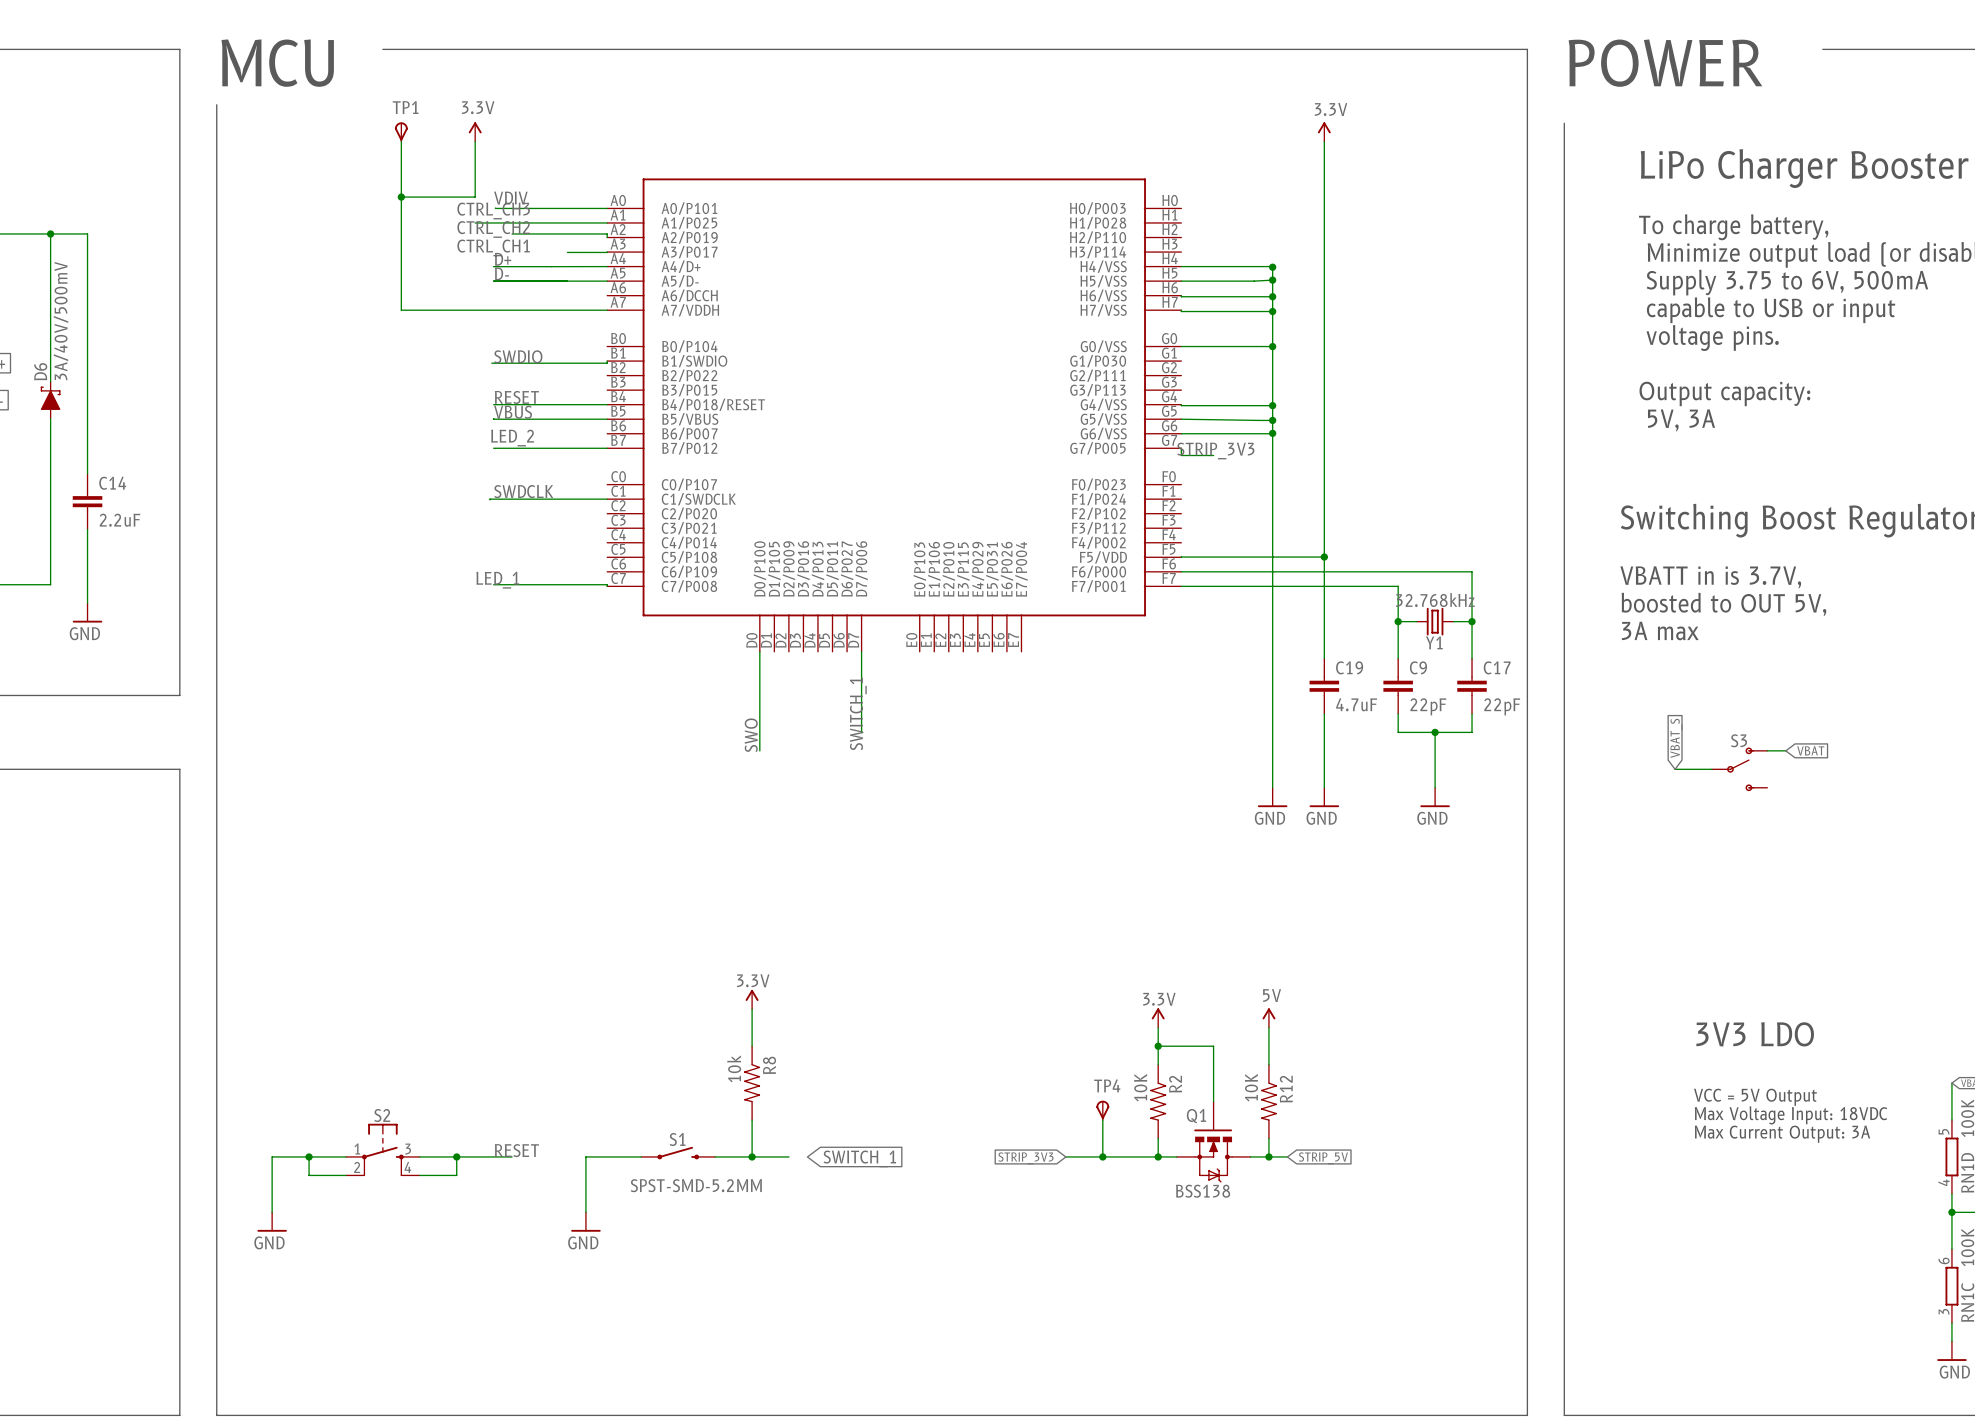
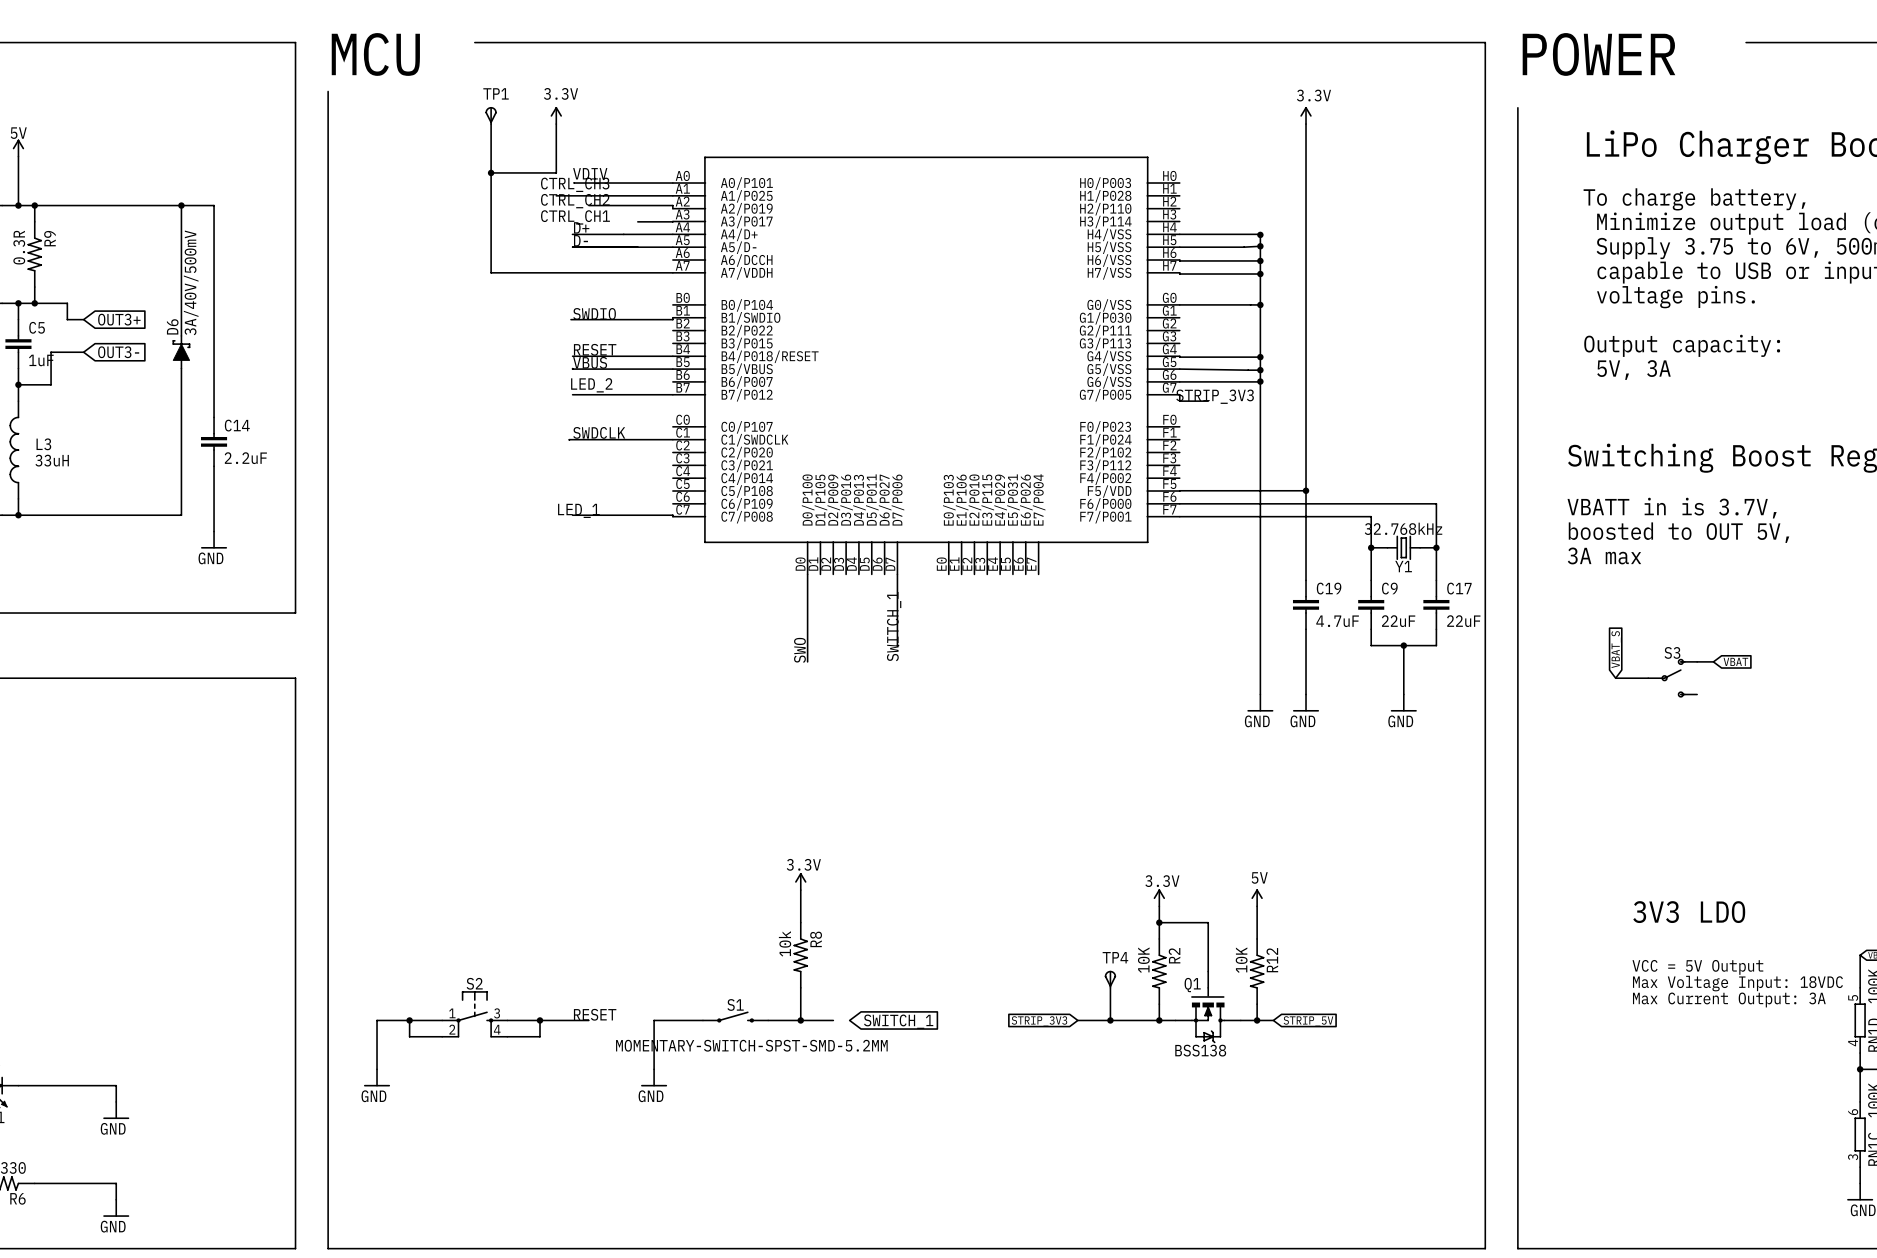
C9 value: 22pF (1428, 706) -> 22uF (1398, 621)
C17 value: 22pF (1502, 706) -> 22uF (1463, 621)
S1 value: SPST-SMD-5.2MM (696, 1185) -> MOMENTARY-SWITCH-SPST-SMD-5.2MM (751, 1045)

